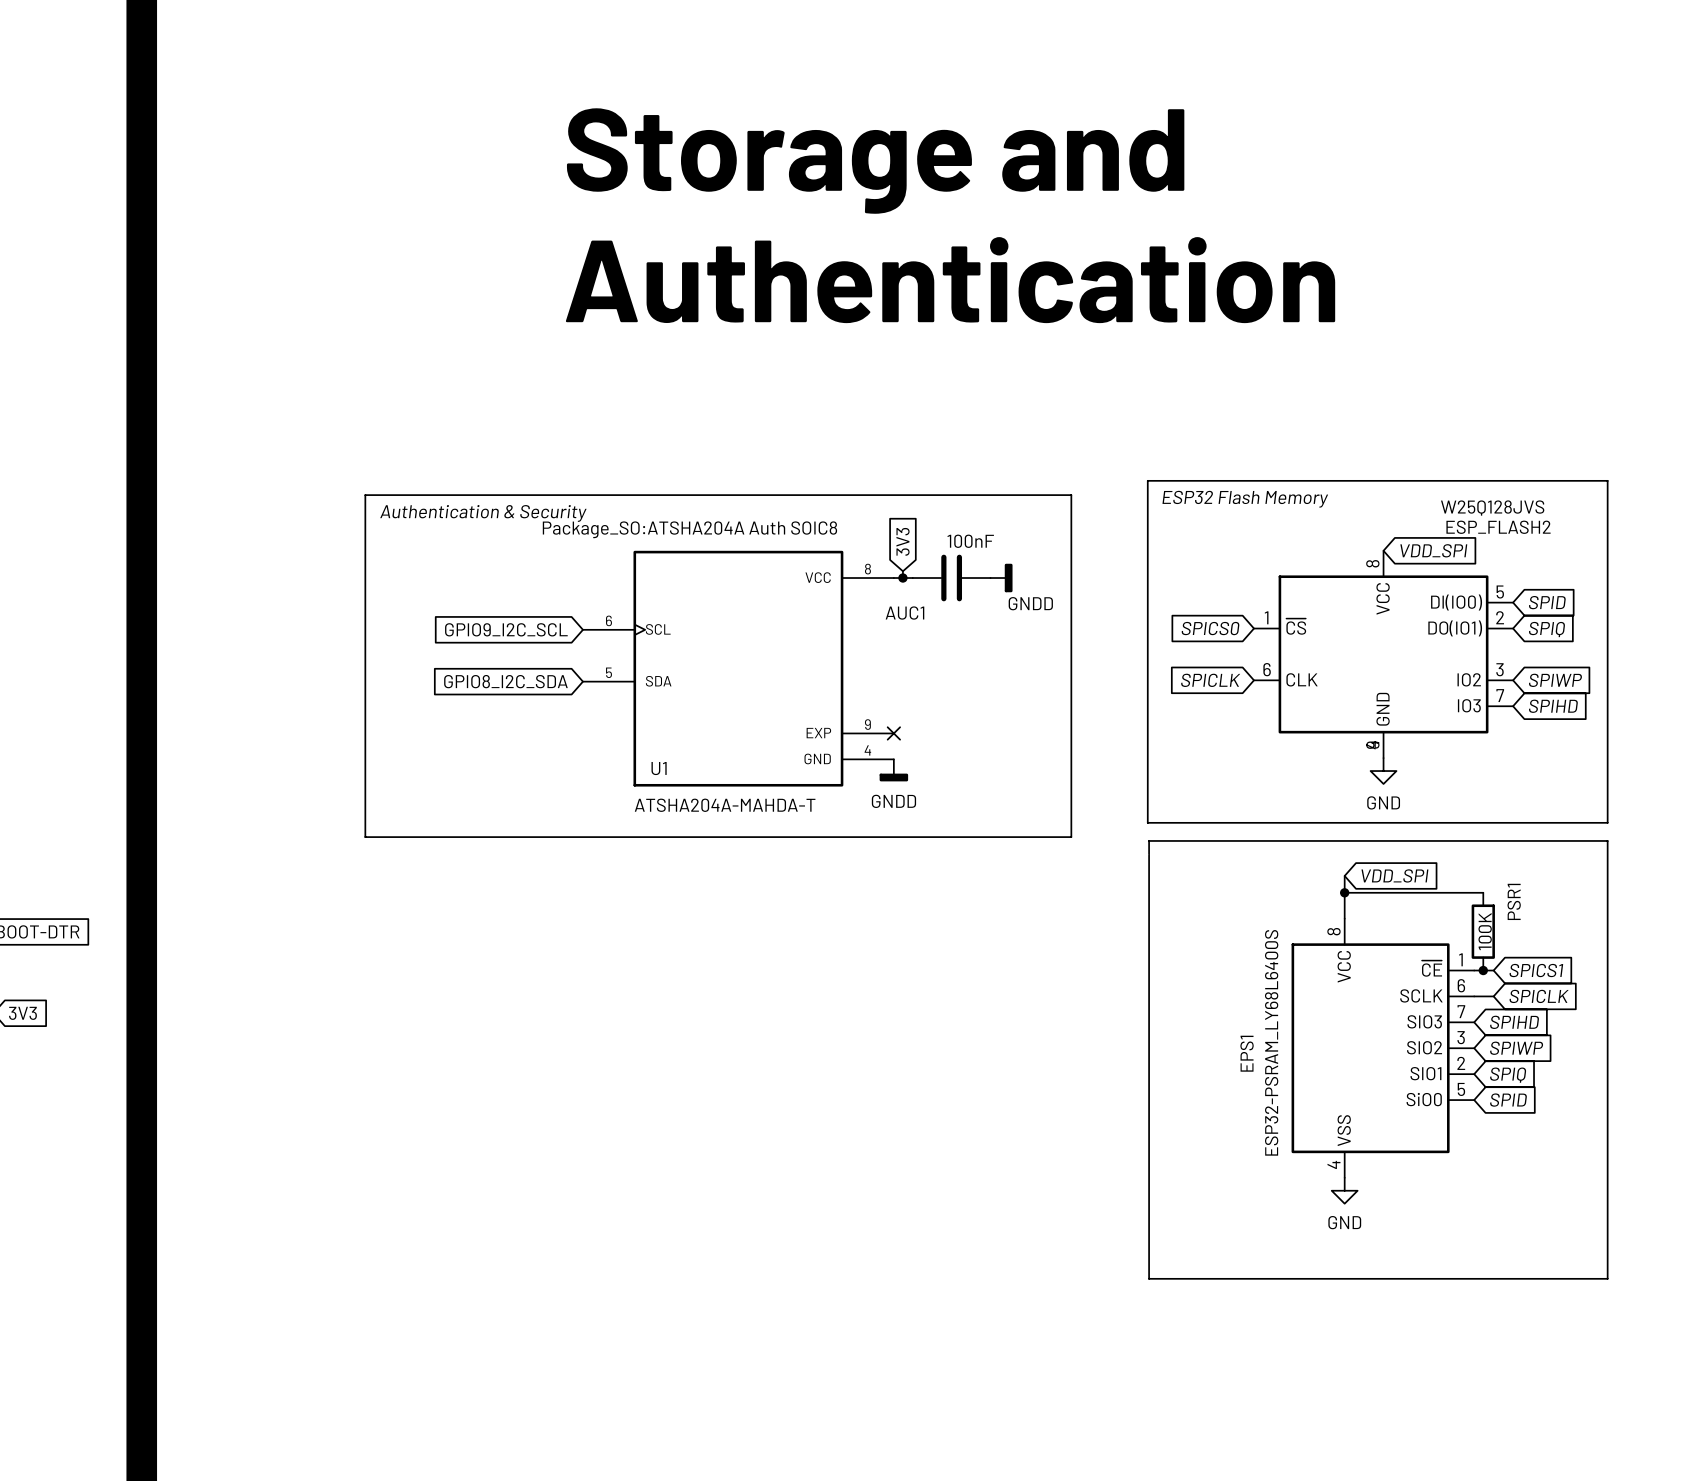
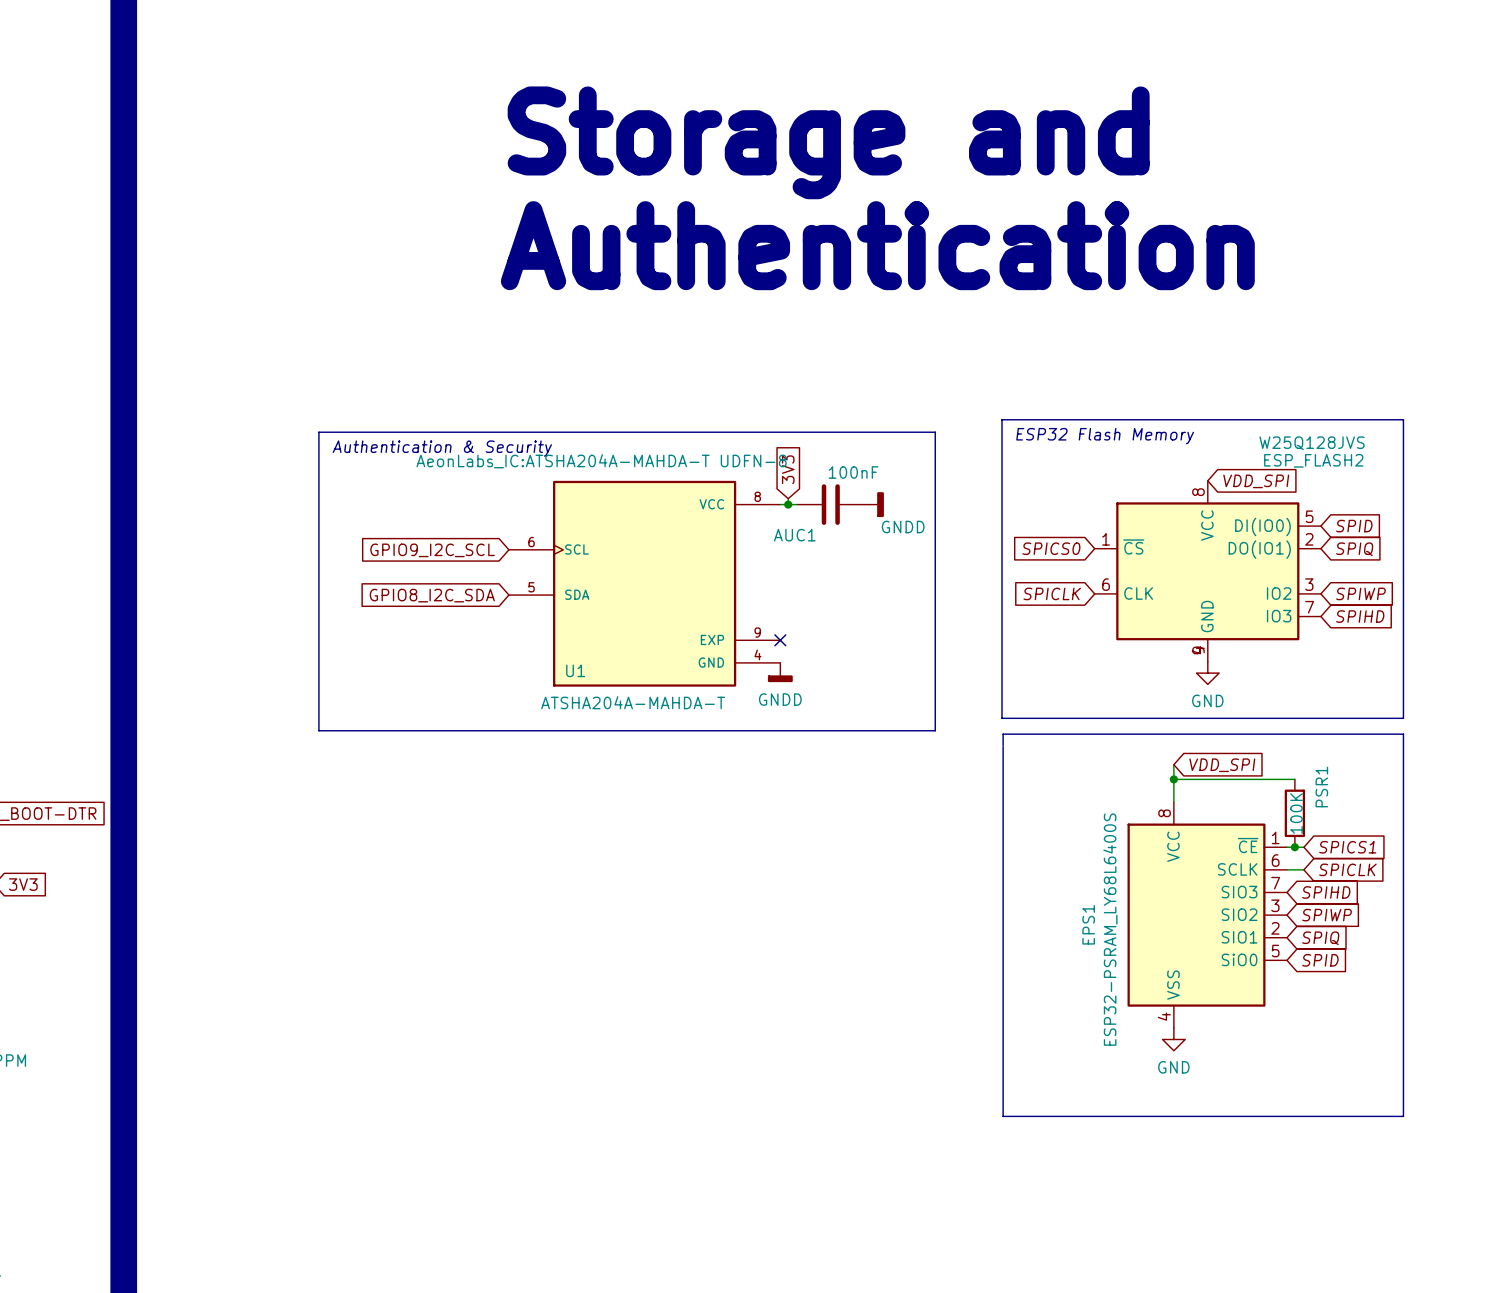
U1 text: Package_SO:ATSHA204A Auth SOIC8 (689, 529) -> AeonLabs_IC:ATSHA204A-MAHDA-T UDFN-8 (601, 461)

